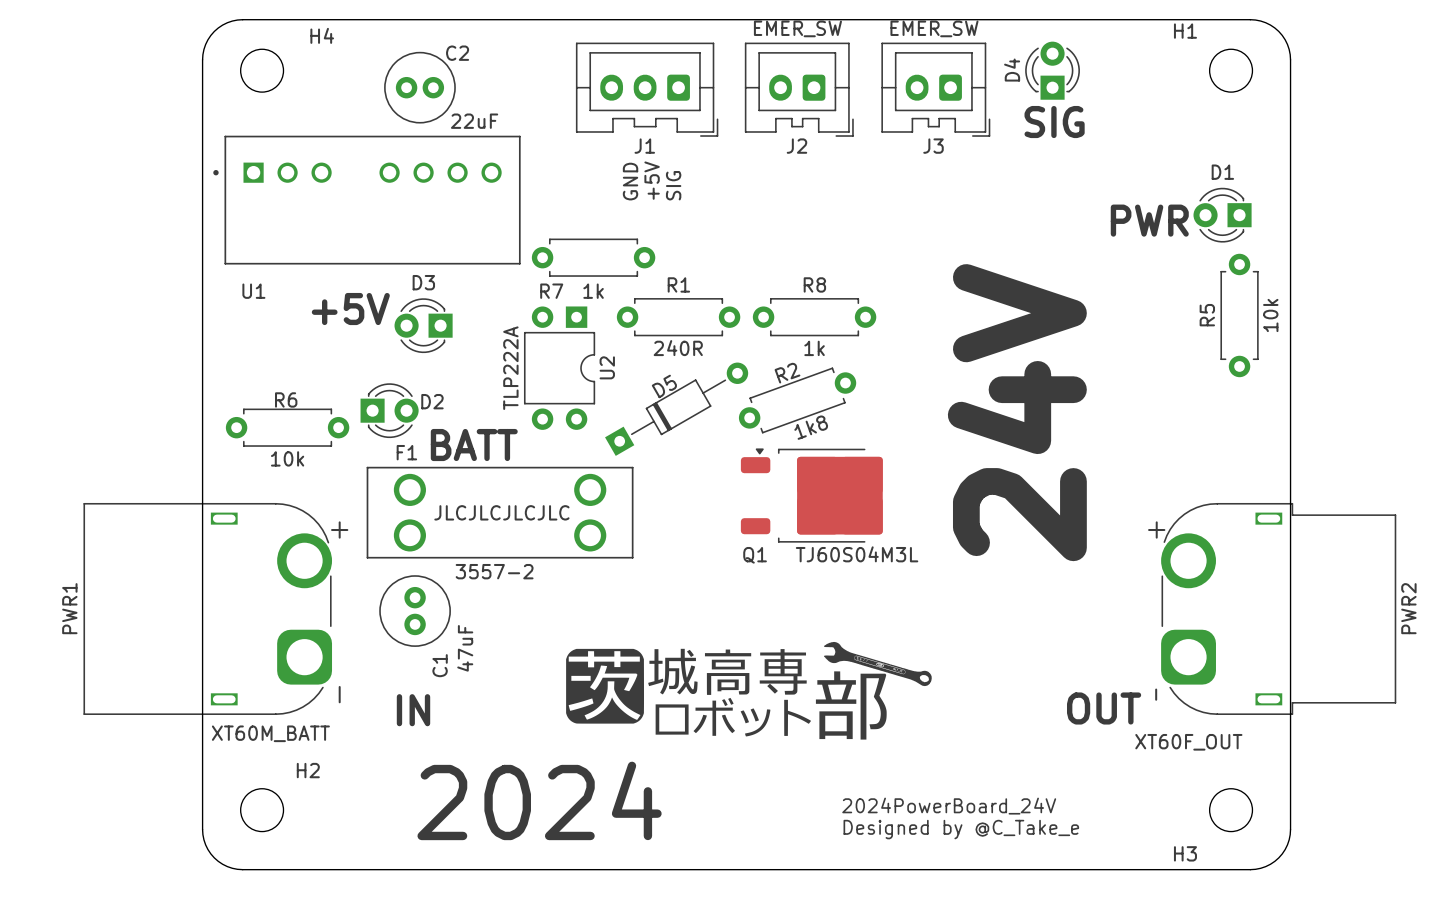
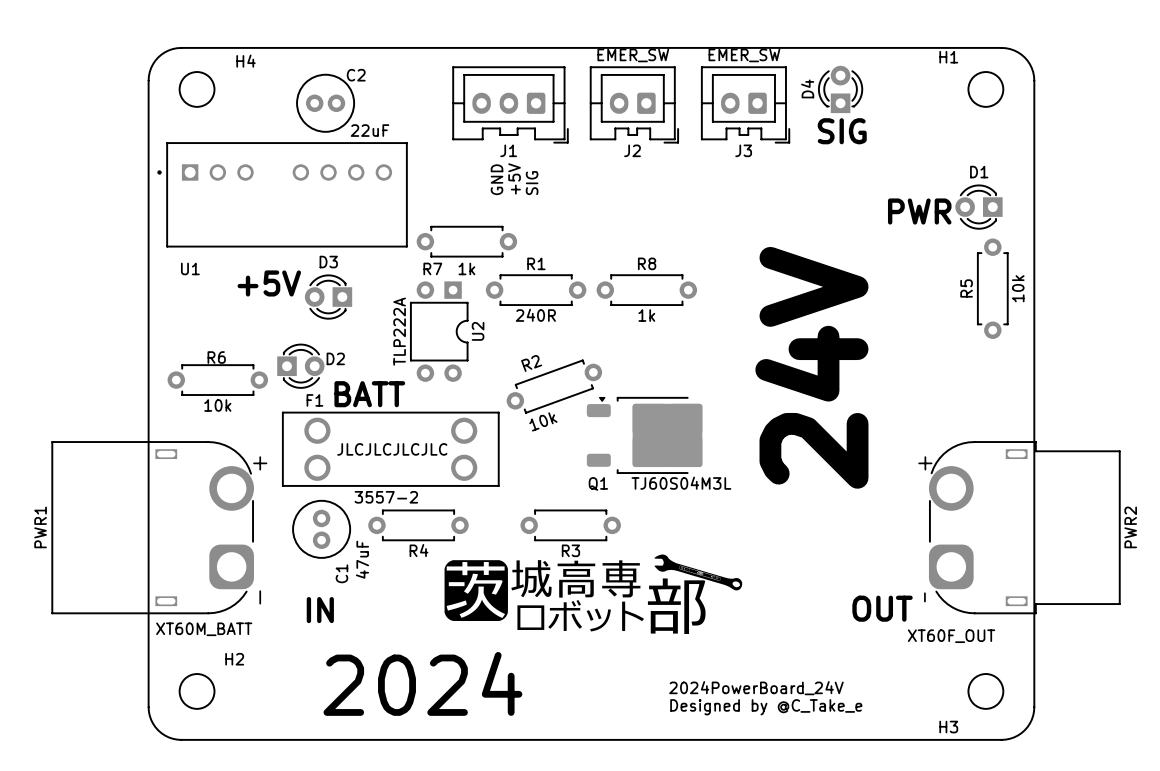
R2 name position: R2 (787, 373) -> R2 (531, 363)
R2 position: (797, 400) -> (554, 386)
D5: (676, 409) -> none
R2 value: 1k8 (811, 427) -> 10k (543, 421)
R4: none -> (418, 525)
R3: none -> (570, 525)

